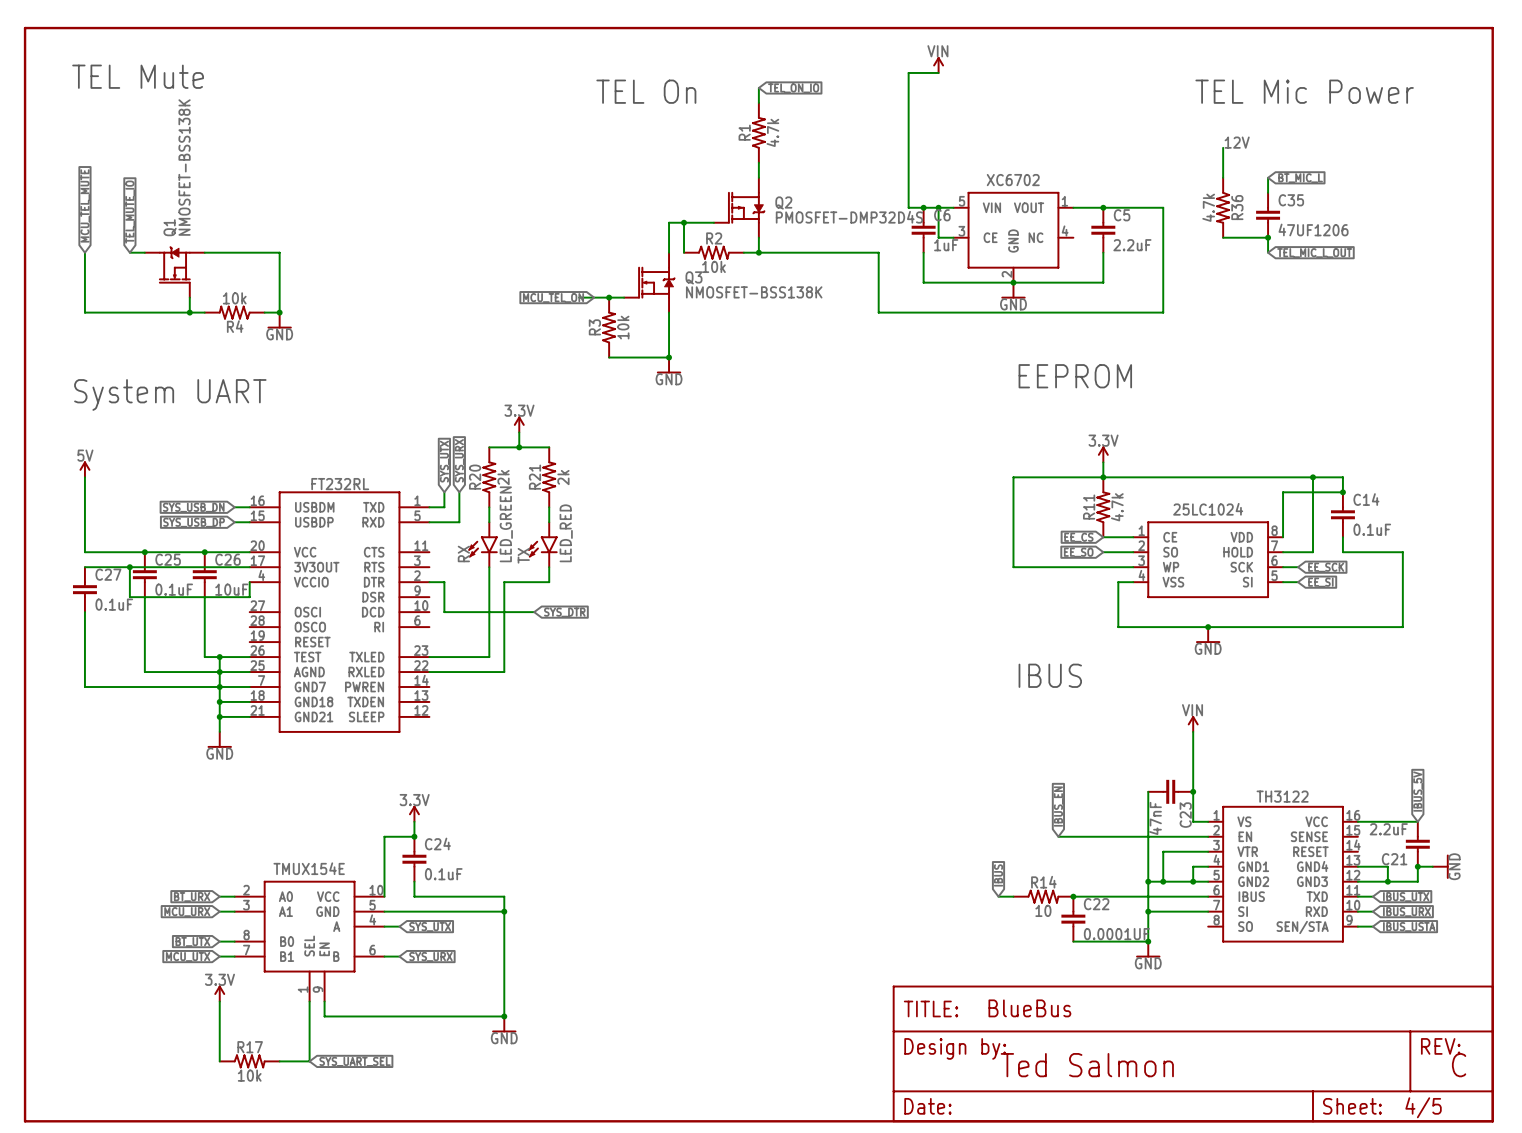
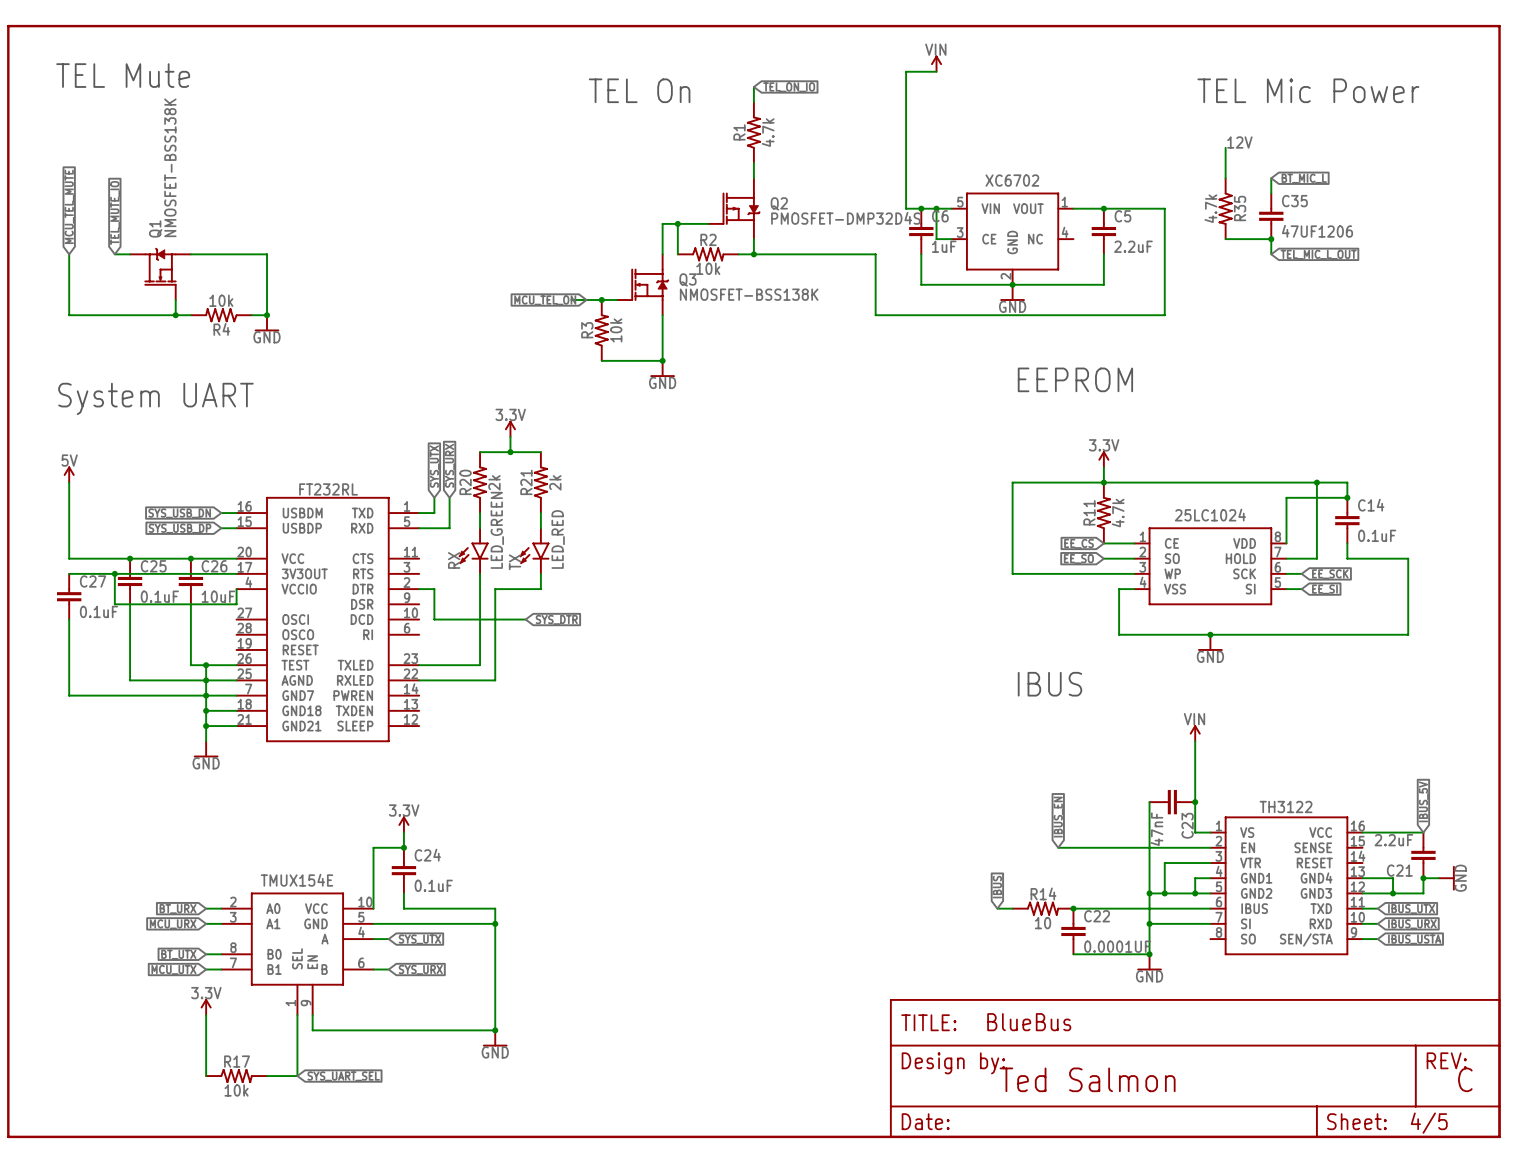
R36 name: R36 (1237, 207) -> R35 (1240, 208)

